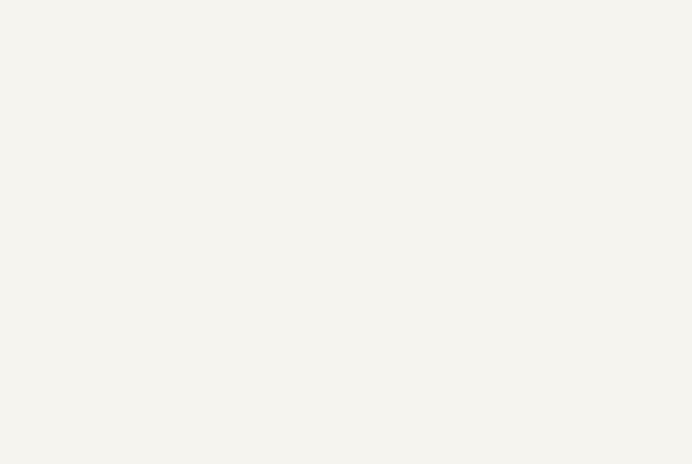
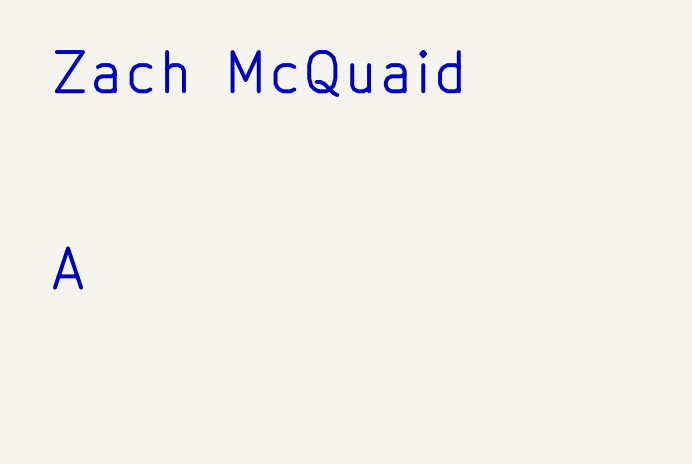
text: none -> Zach McQuaid (257, 73)
text: none -> A (68, 267)

